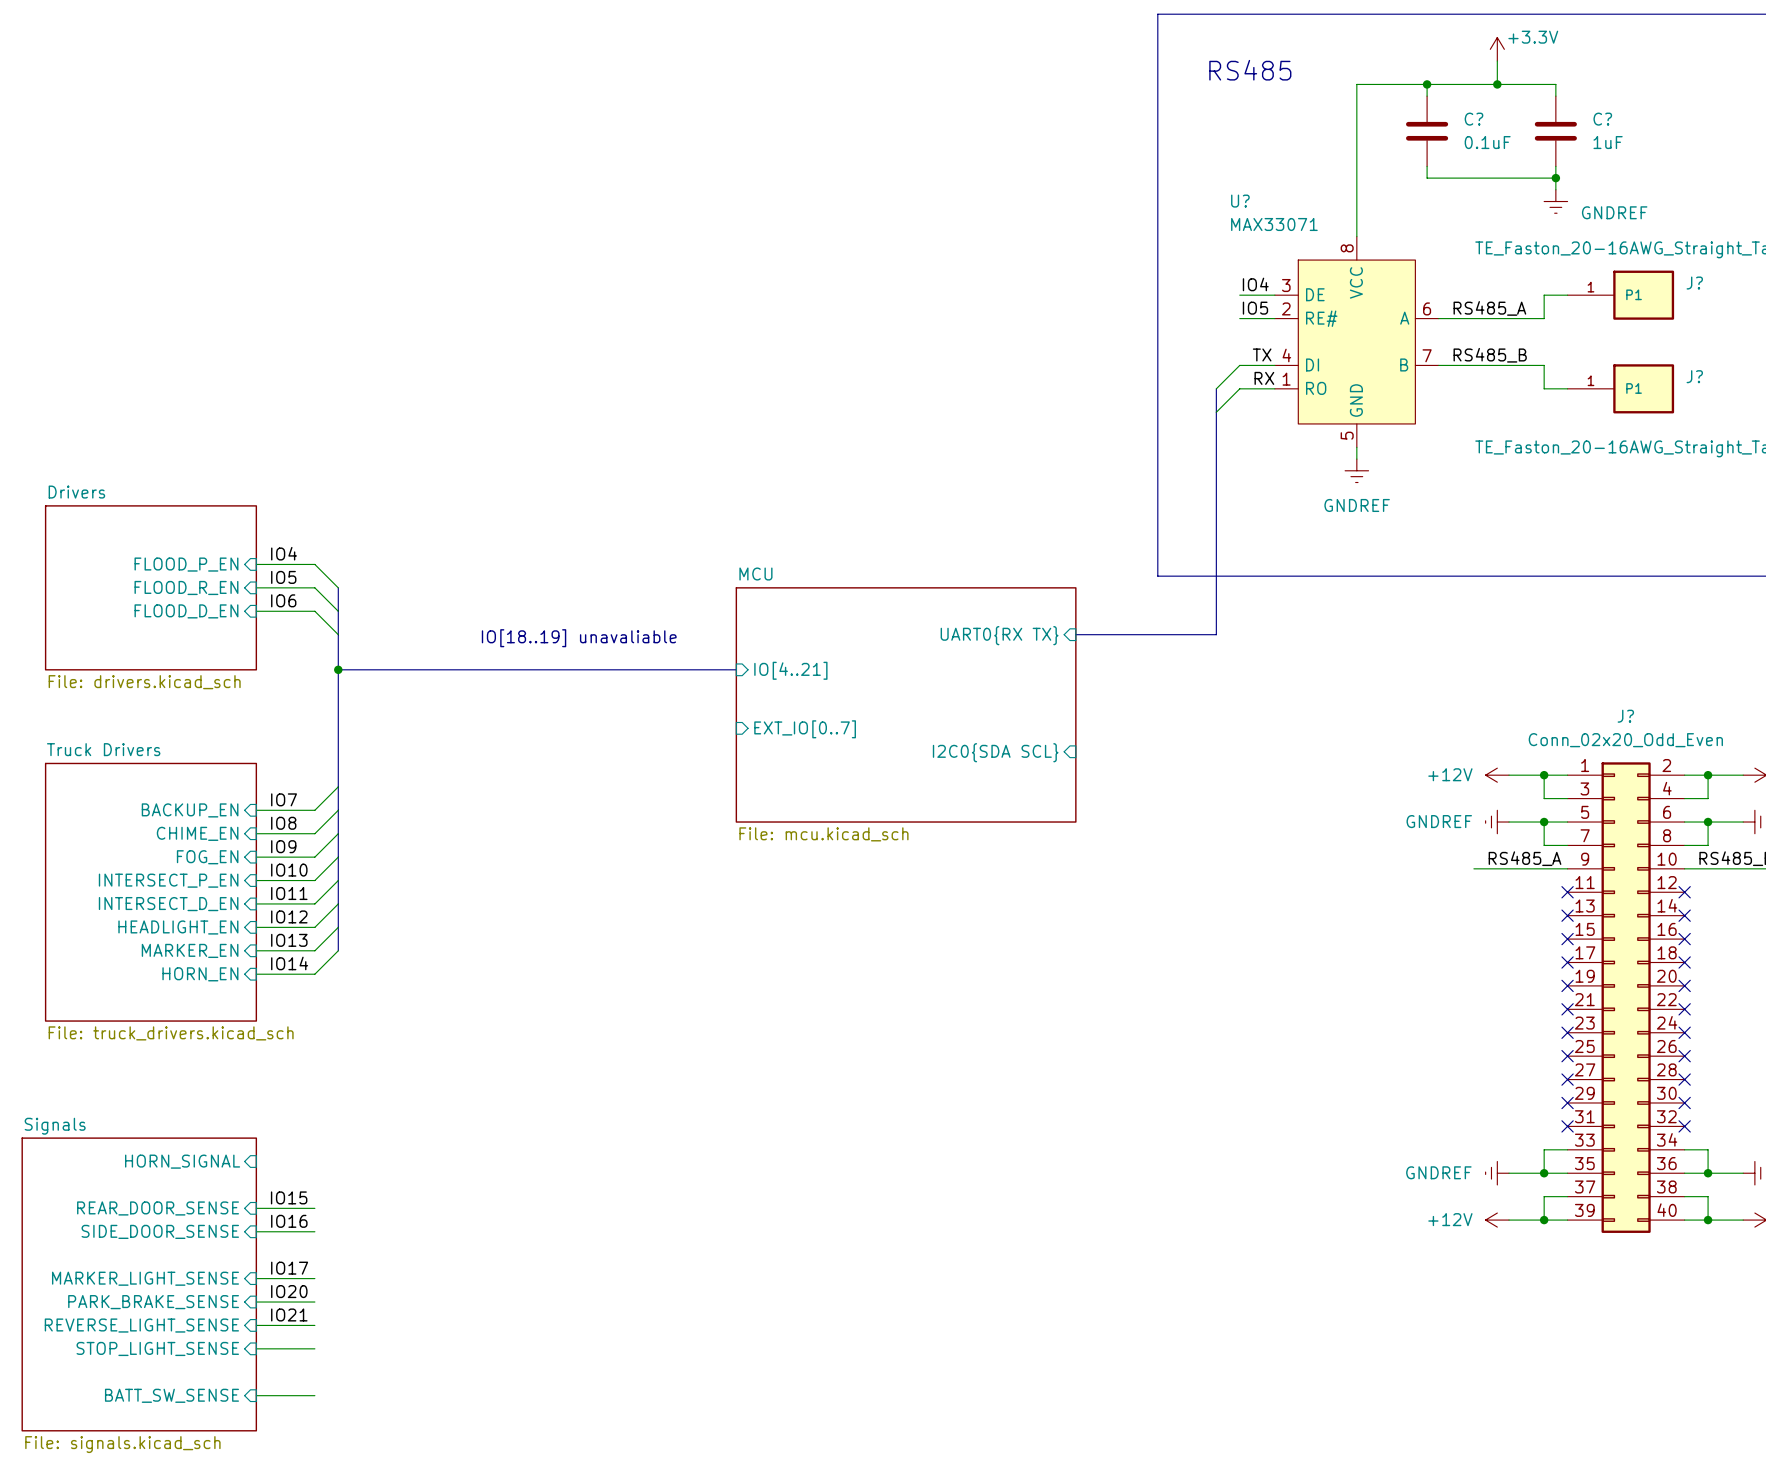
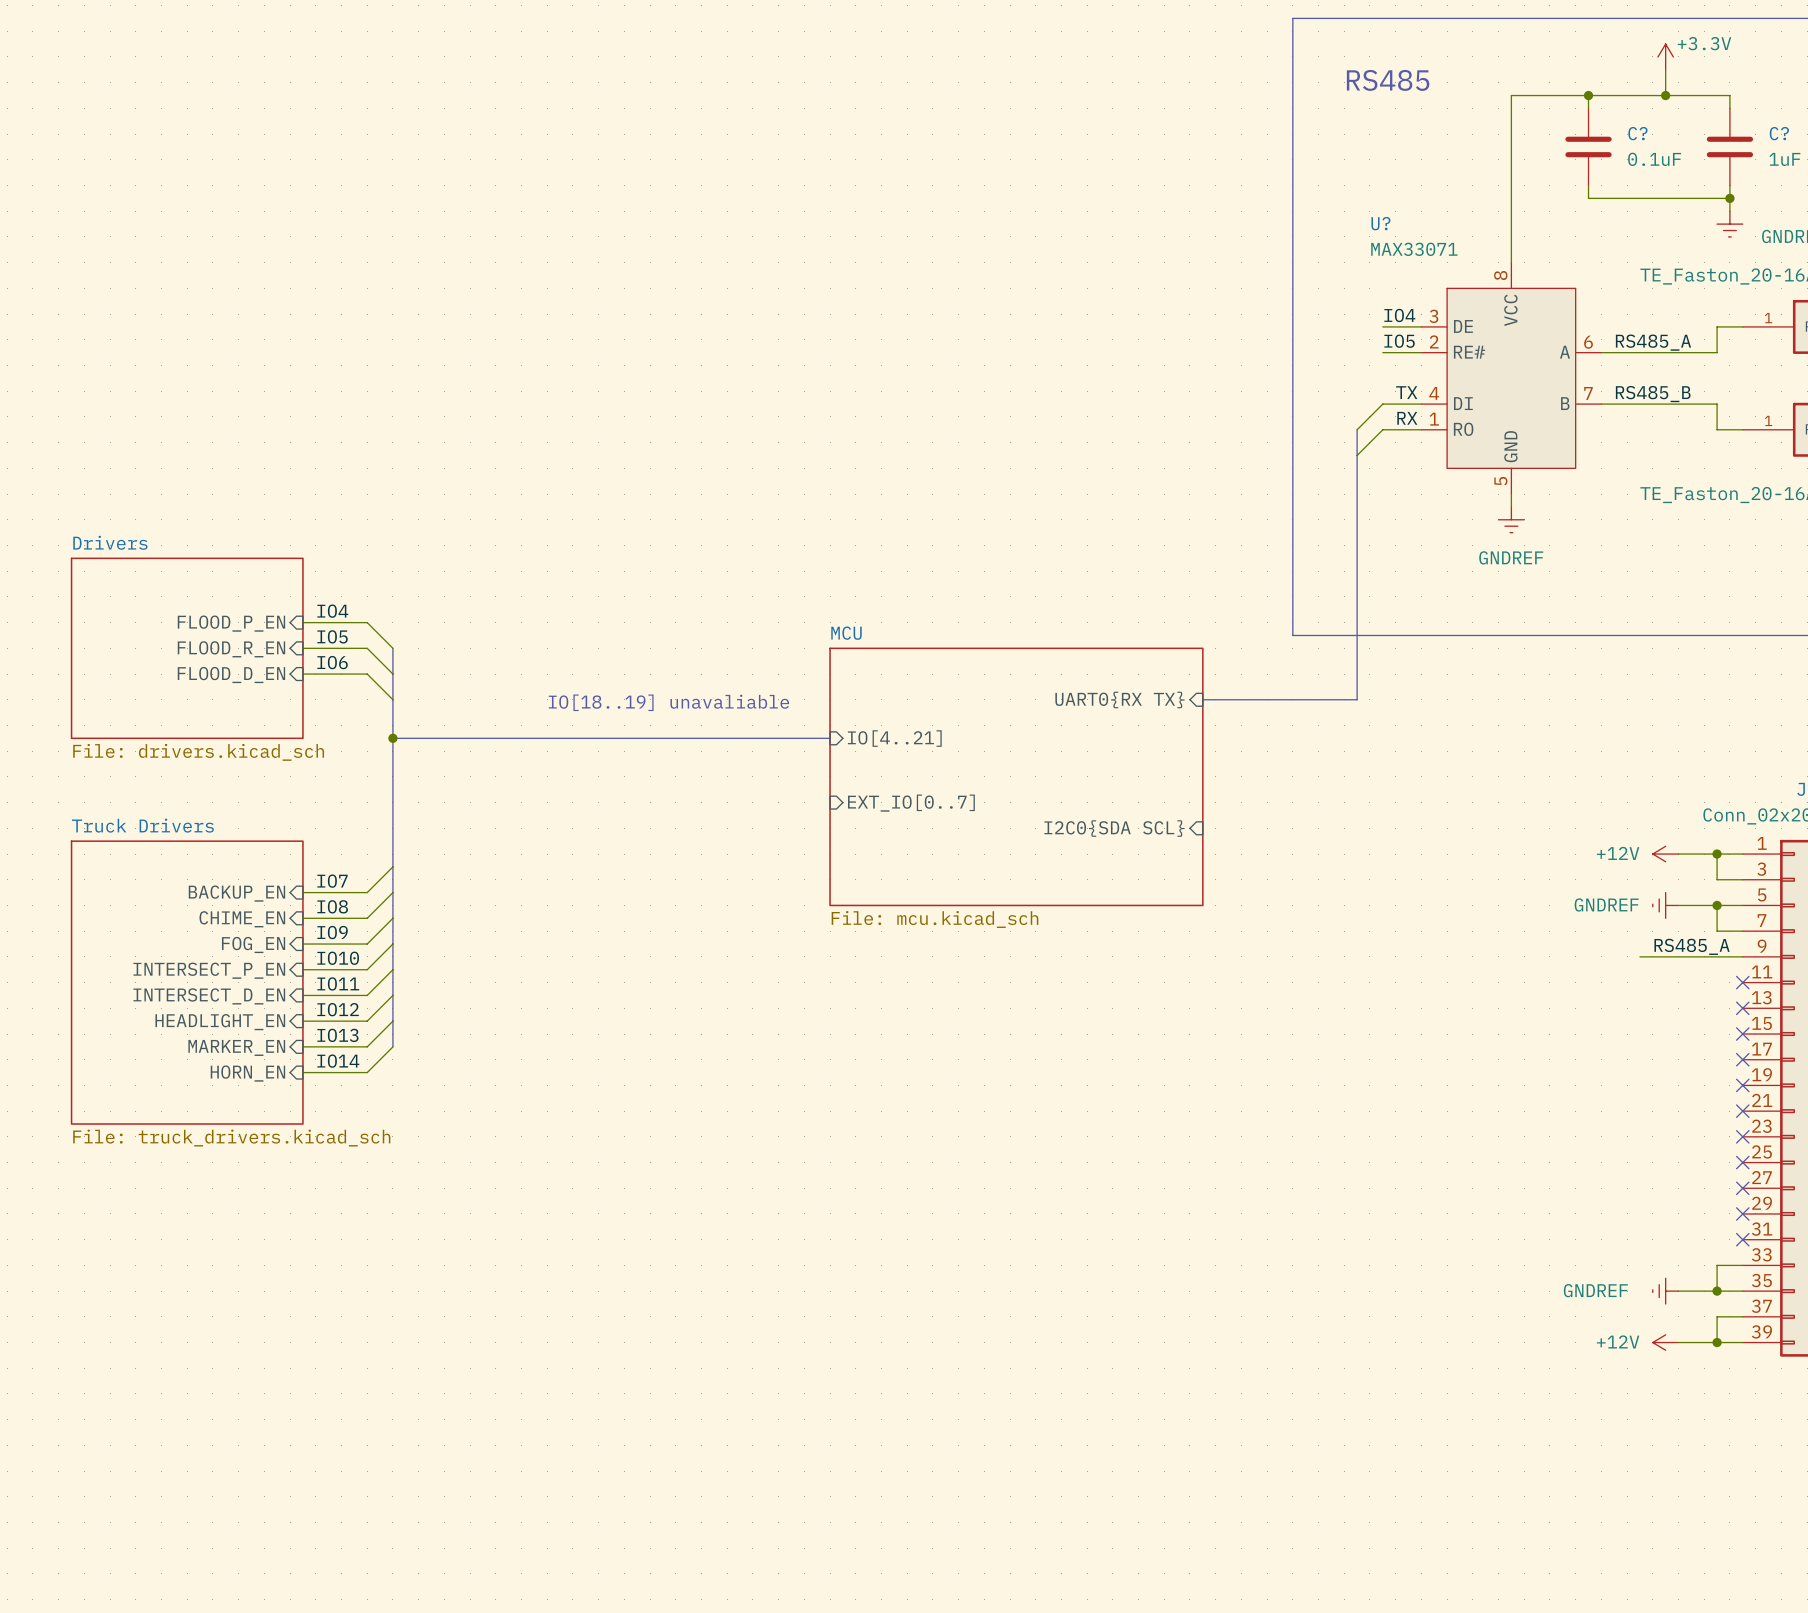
sheet pin: HORN_SIGNAL (182, 1161) -> none
label: IO15 (289, 1197) -> none
sheet pin: REAR_DOOR_SENSE (158, 1208) -> none
wire: (256, 1208) (314, 1208) -> none
label: IO16 (289, 1221) -> none
sheet pin: SIDE_DOOR_SENSE (160, 1231) -> none
wire: (256, 1231) (314, 1231) -> none
label: IO17 (289, 1268) -> none
sheet pin: MARKER_LIGHT_SENSE (145, 1278) -> none
wire: (256, 1278) (314, 1278) -> none
sheet Signals: File: signals.kicad_sch (139, 1284) -> none
label: IO20 (289, 1291) -> none
sheet pin: PARK_BRAKE_SENSE (153, 1302) -> none
wire: (256, 1302) (314, 1302) -> none
label: IO21 (289, 1314) -> none
sheet pin: REVERSE_LIGHT_SENSE (141, 1325) -> none
wire: (256, 1325) (314, 1325) -> none
sheet pin: STOP_LIGHT_SENSE (157, 1348) -> none
wire: (256, 1348) (314, 1348) -> none
sheet pin: BATT_SW_SENSE (171, 1395) -> none
wire: (256, 1395) (314, 1395) -> none

